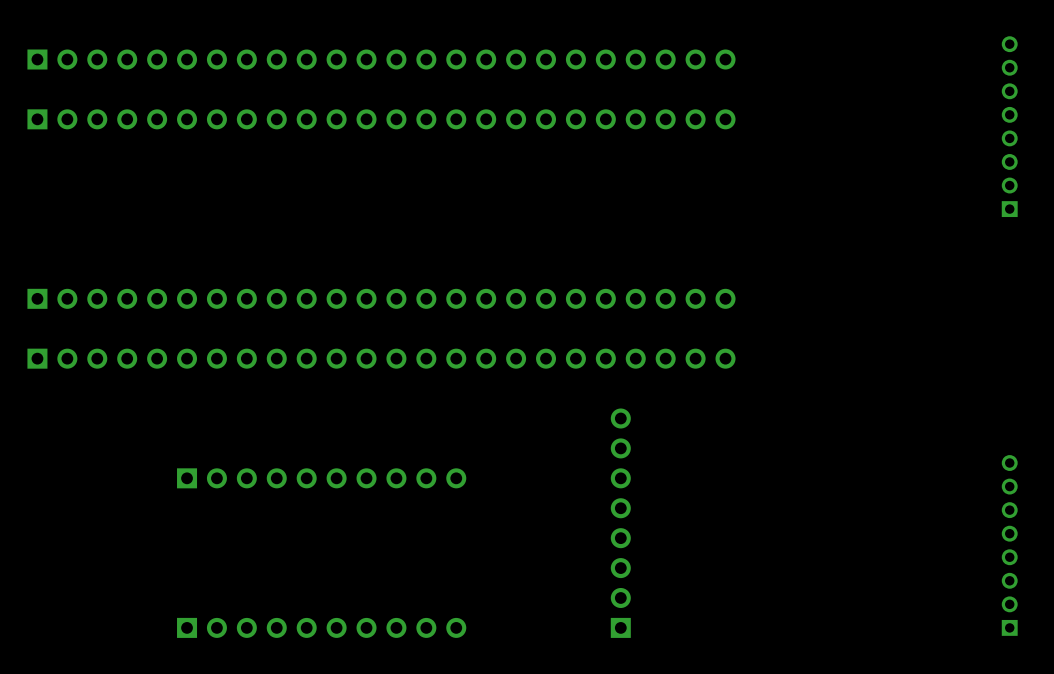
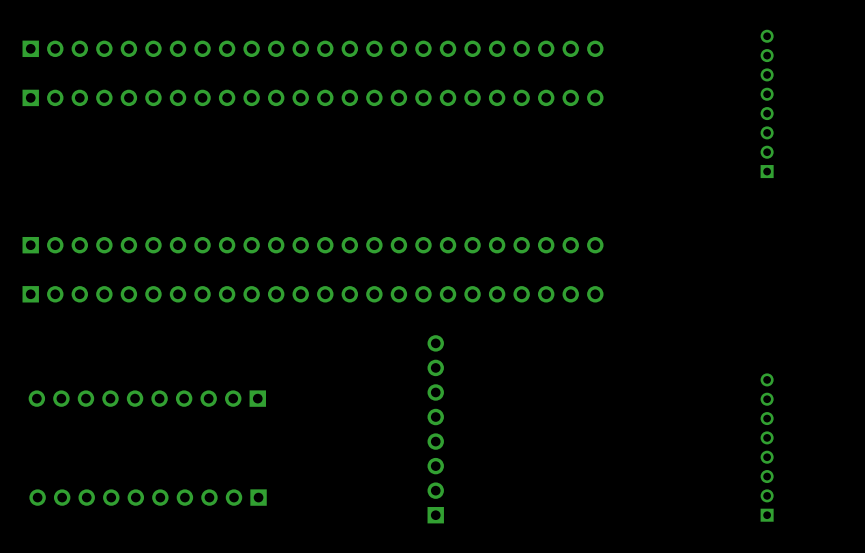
part position: (1009, 126) -> (767, 103)
part: (321, 478) -> none
part: none -> (147, 398)
part position: (620, 523) -> (435, 429)
part position: (1009, 545) -> (767, 447)
part: none -> (148, 497)
part: (321, 627) -> none

